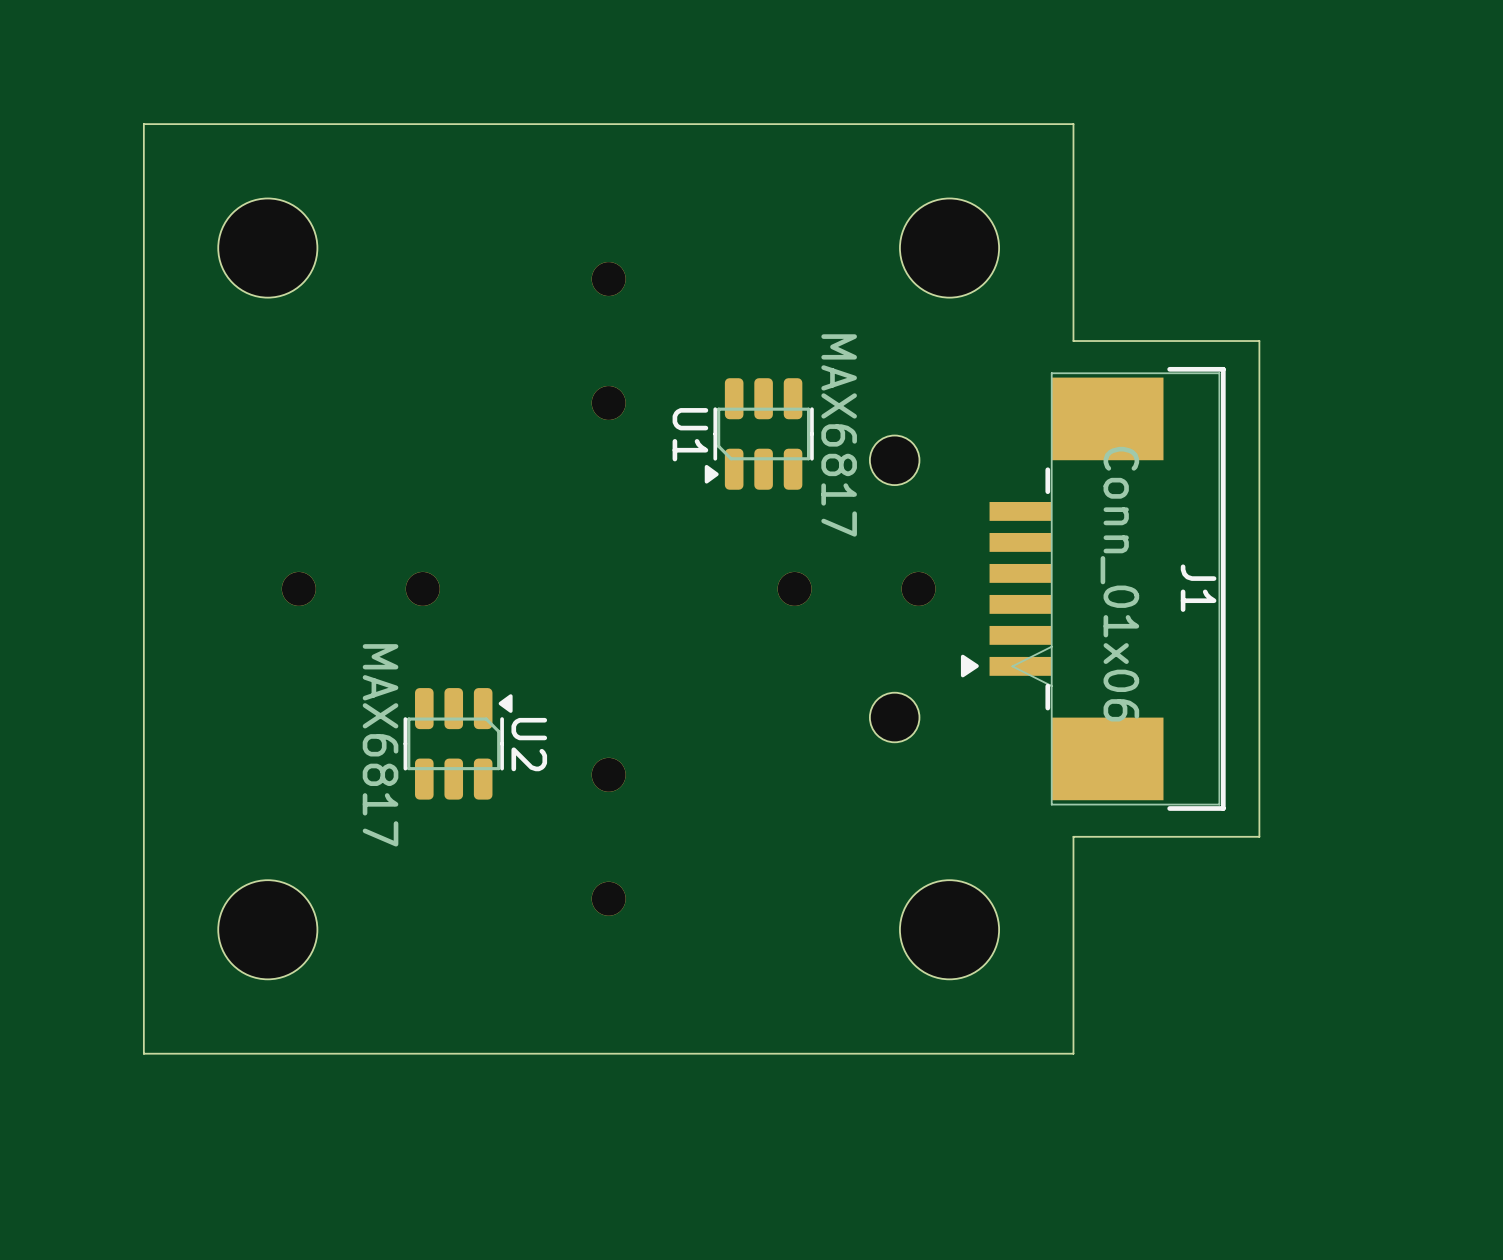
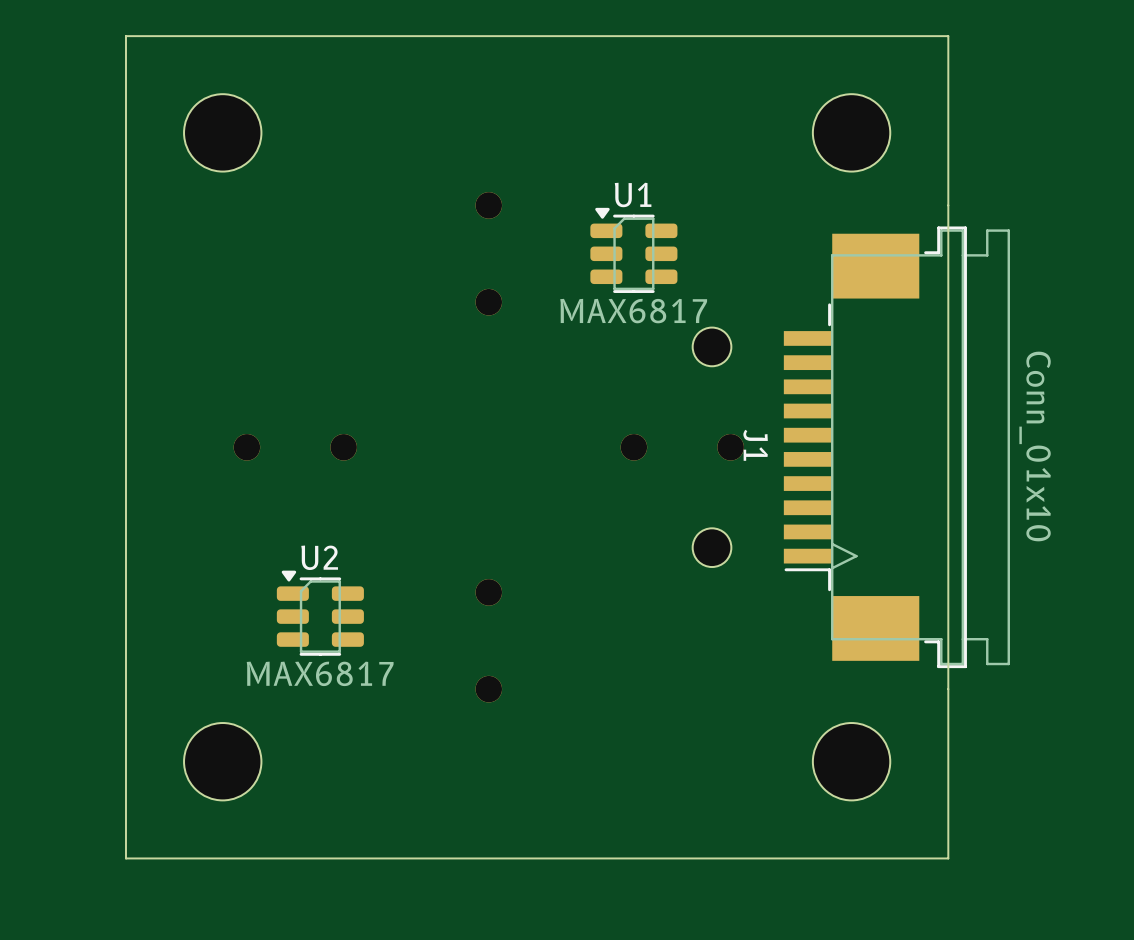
board edge: (143, 124) (1073, 124) (1073, 341) (1259, 341) (1259, 836) (1073, 836) (1073, 1053) (143, 1053) -> (125, 84) (125, 36) (948, 36) (948, 858) (125, 858) (125, 810)
part position: (267, 248) -> (222, 132)
part position: (949, 248) -> (851, 132)
J1 footprint: [960, 366, 1226, 811] -> [783, 226, 1010, 669]
U1 rotation: 0° (759, 433) -> 90° clockwise (633, 250)
U1 position: (759, 433) -> (633, 250)
J1 value: Conn_01x06 (1119, 584) -> Conn_01x10 (1035, 446)
J1 name position: J1 (1198, 588) -> J1 (755, 445)
U2 rotation: 0° (458, 743) -> 90° counterclockwise (320, 613)
U2 position: (458, 743) -> (320, 613)
part position: (267, 929) -> (222, 761)
part position: (949, 929) -> (851, 761)

